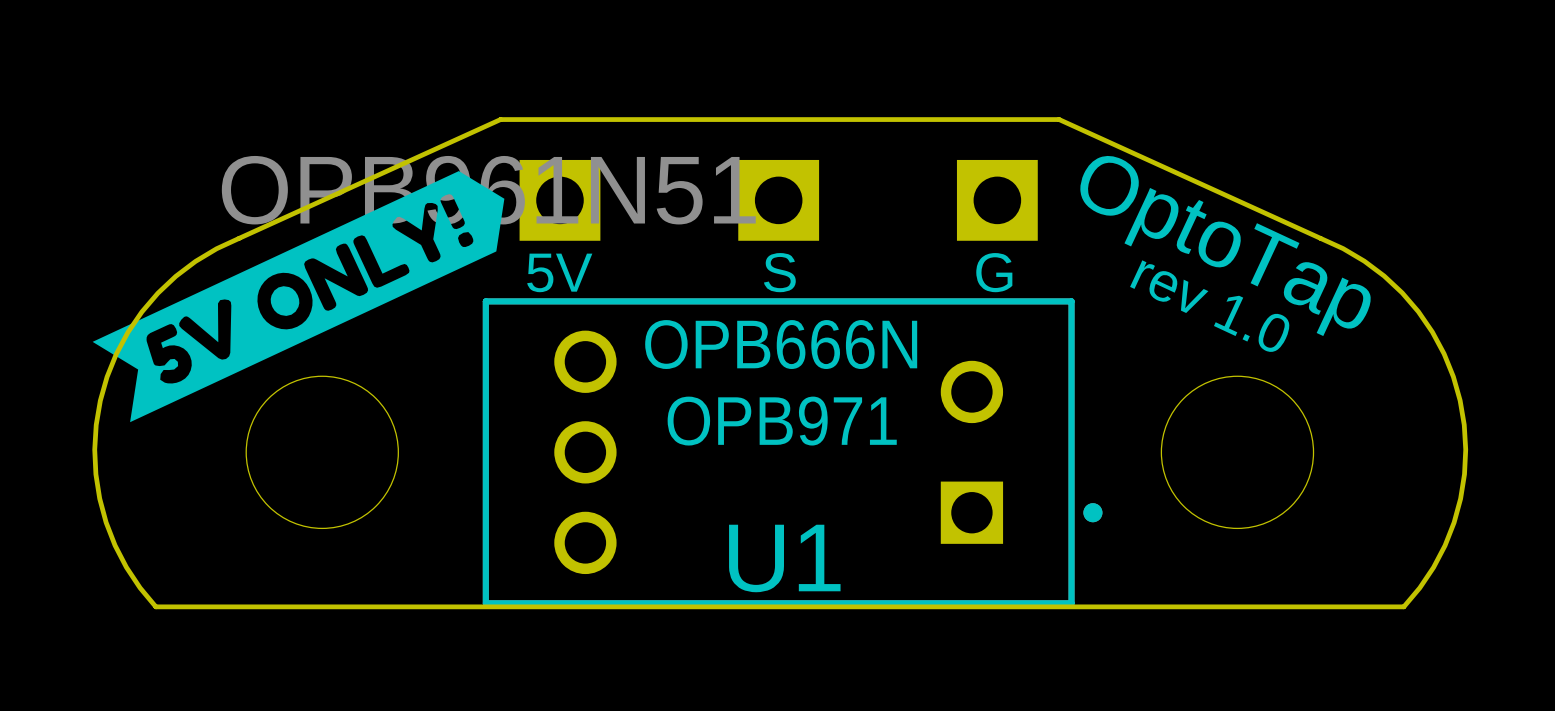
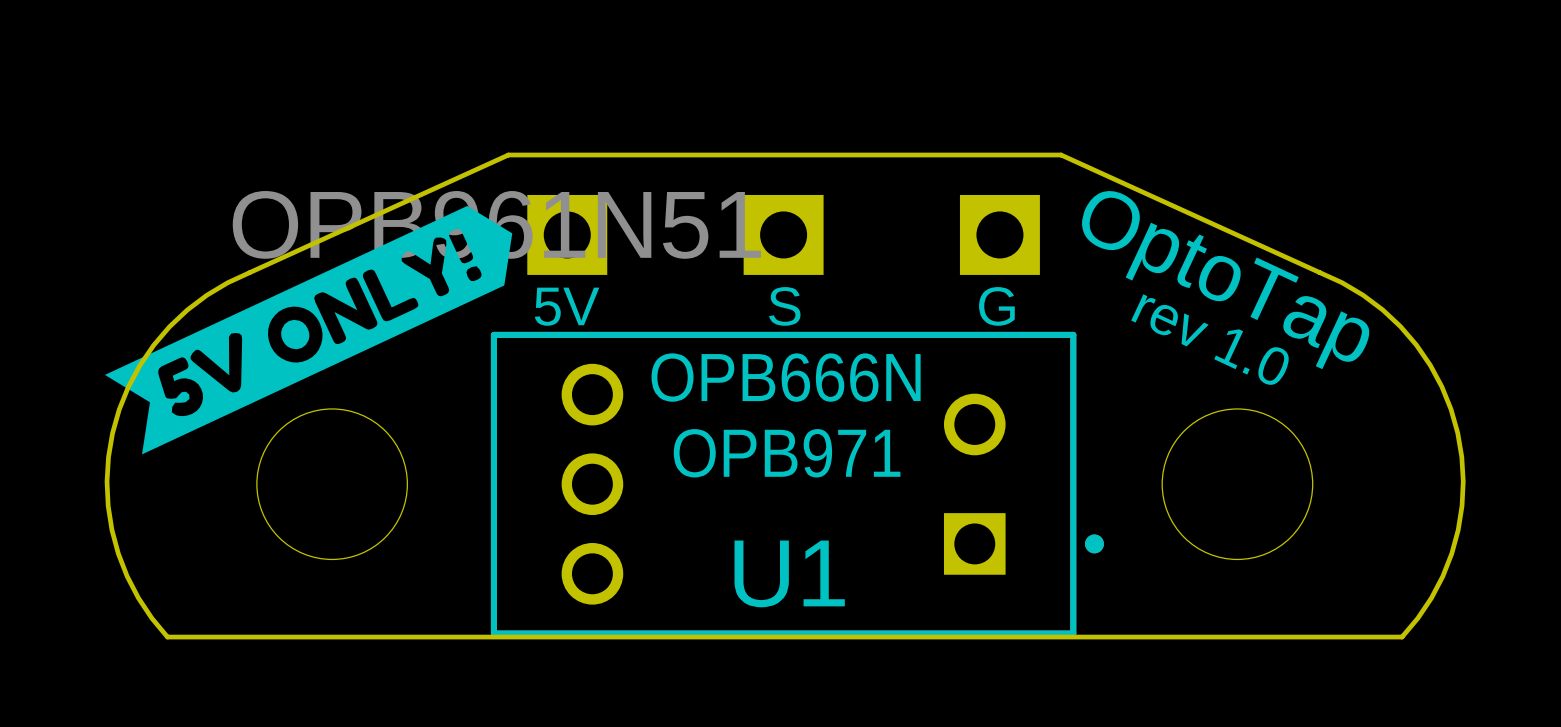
U1 name position: U1 (784, 558) -> U1 (789, 573)

